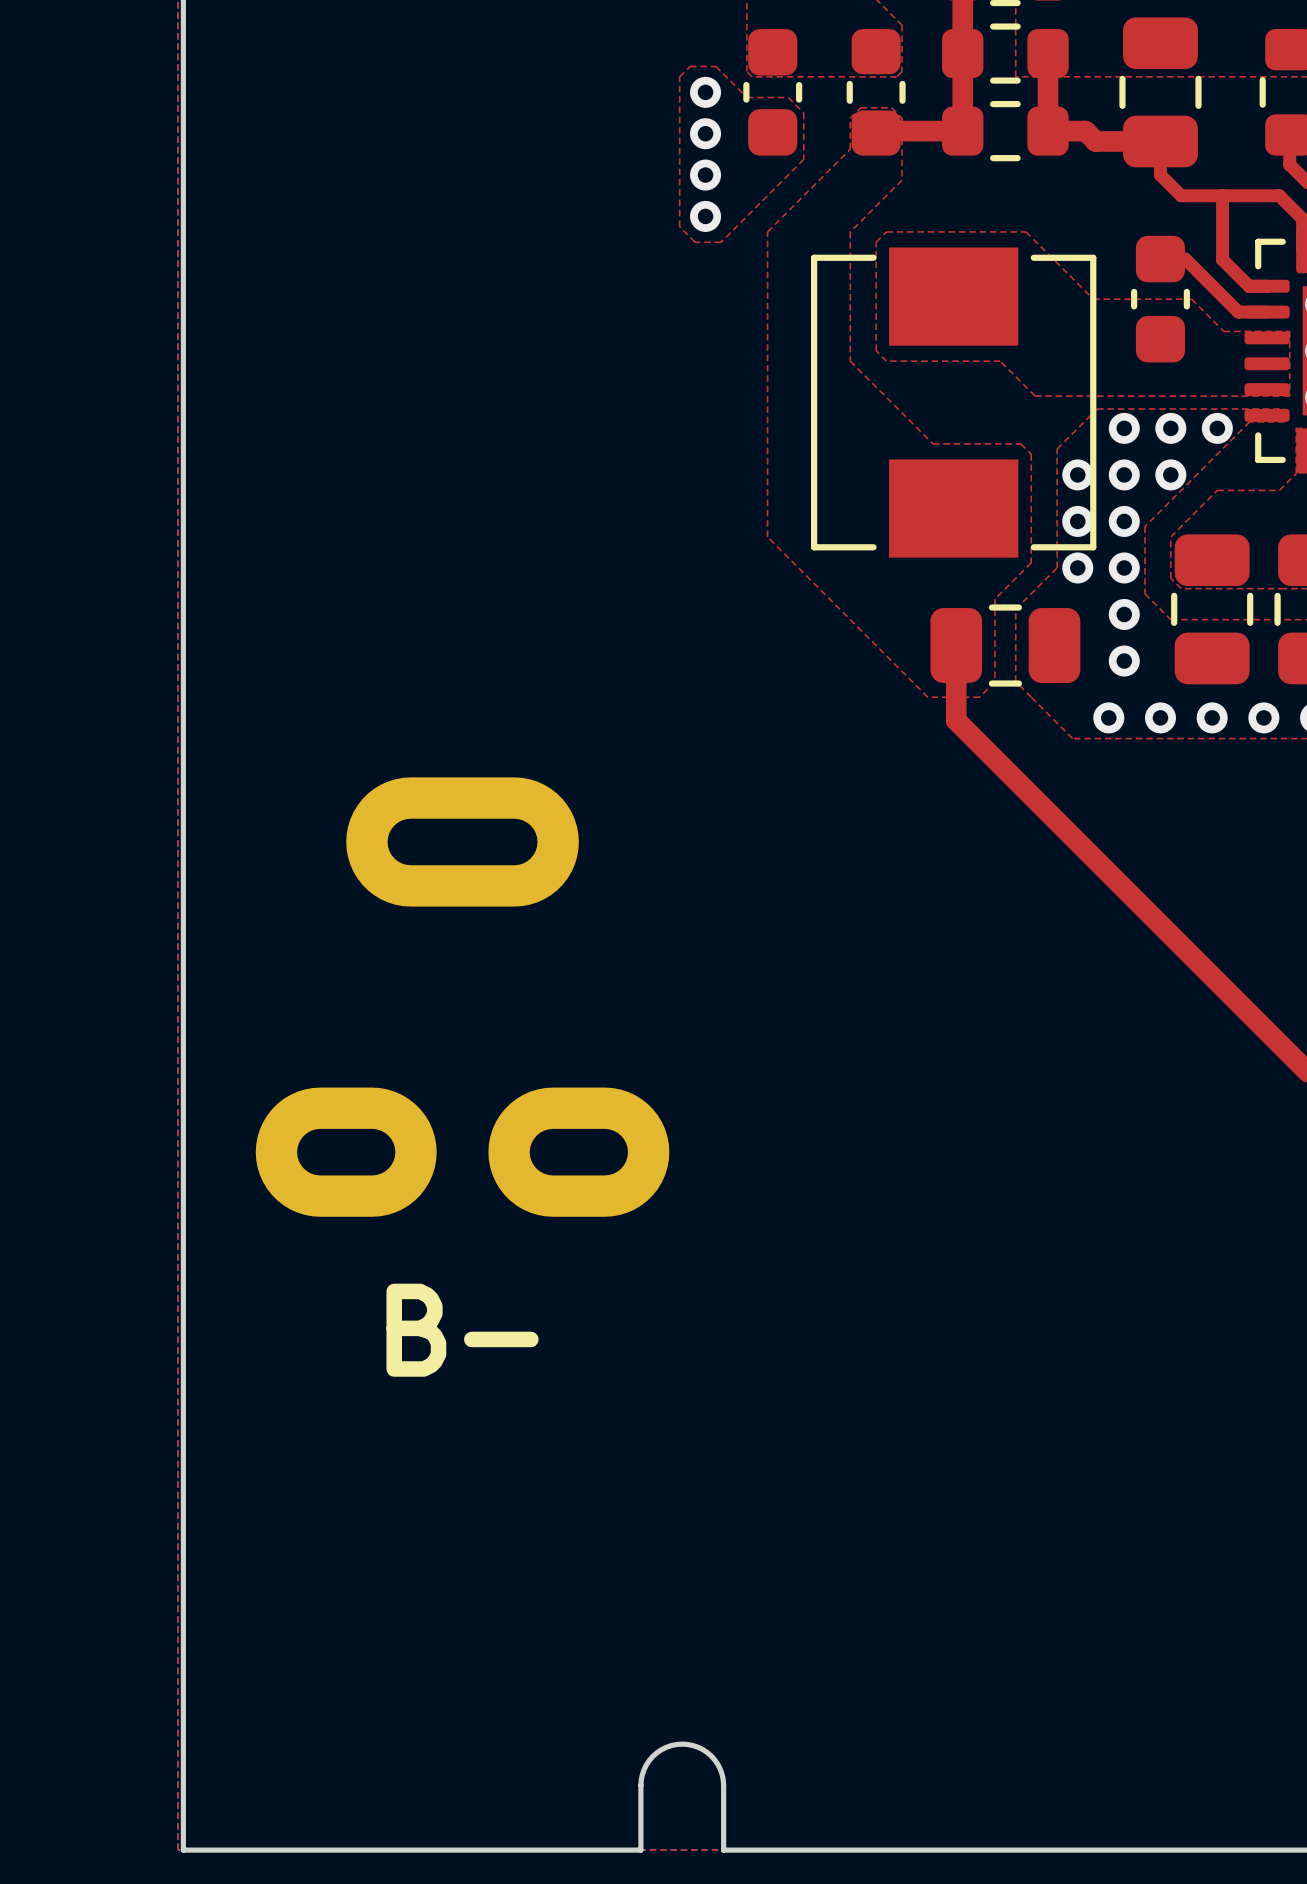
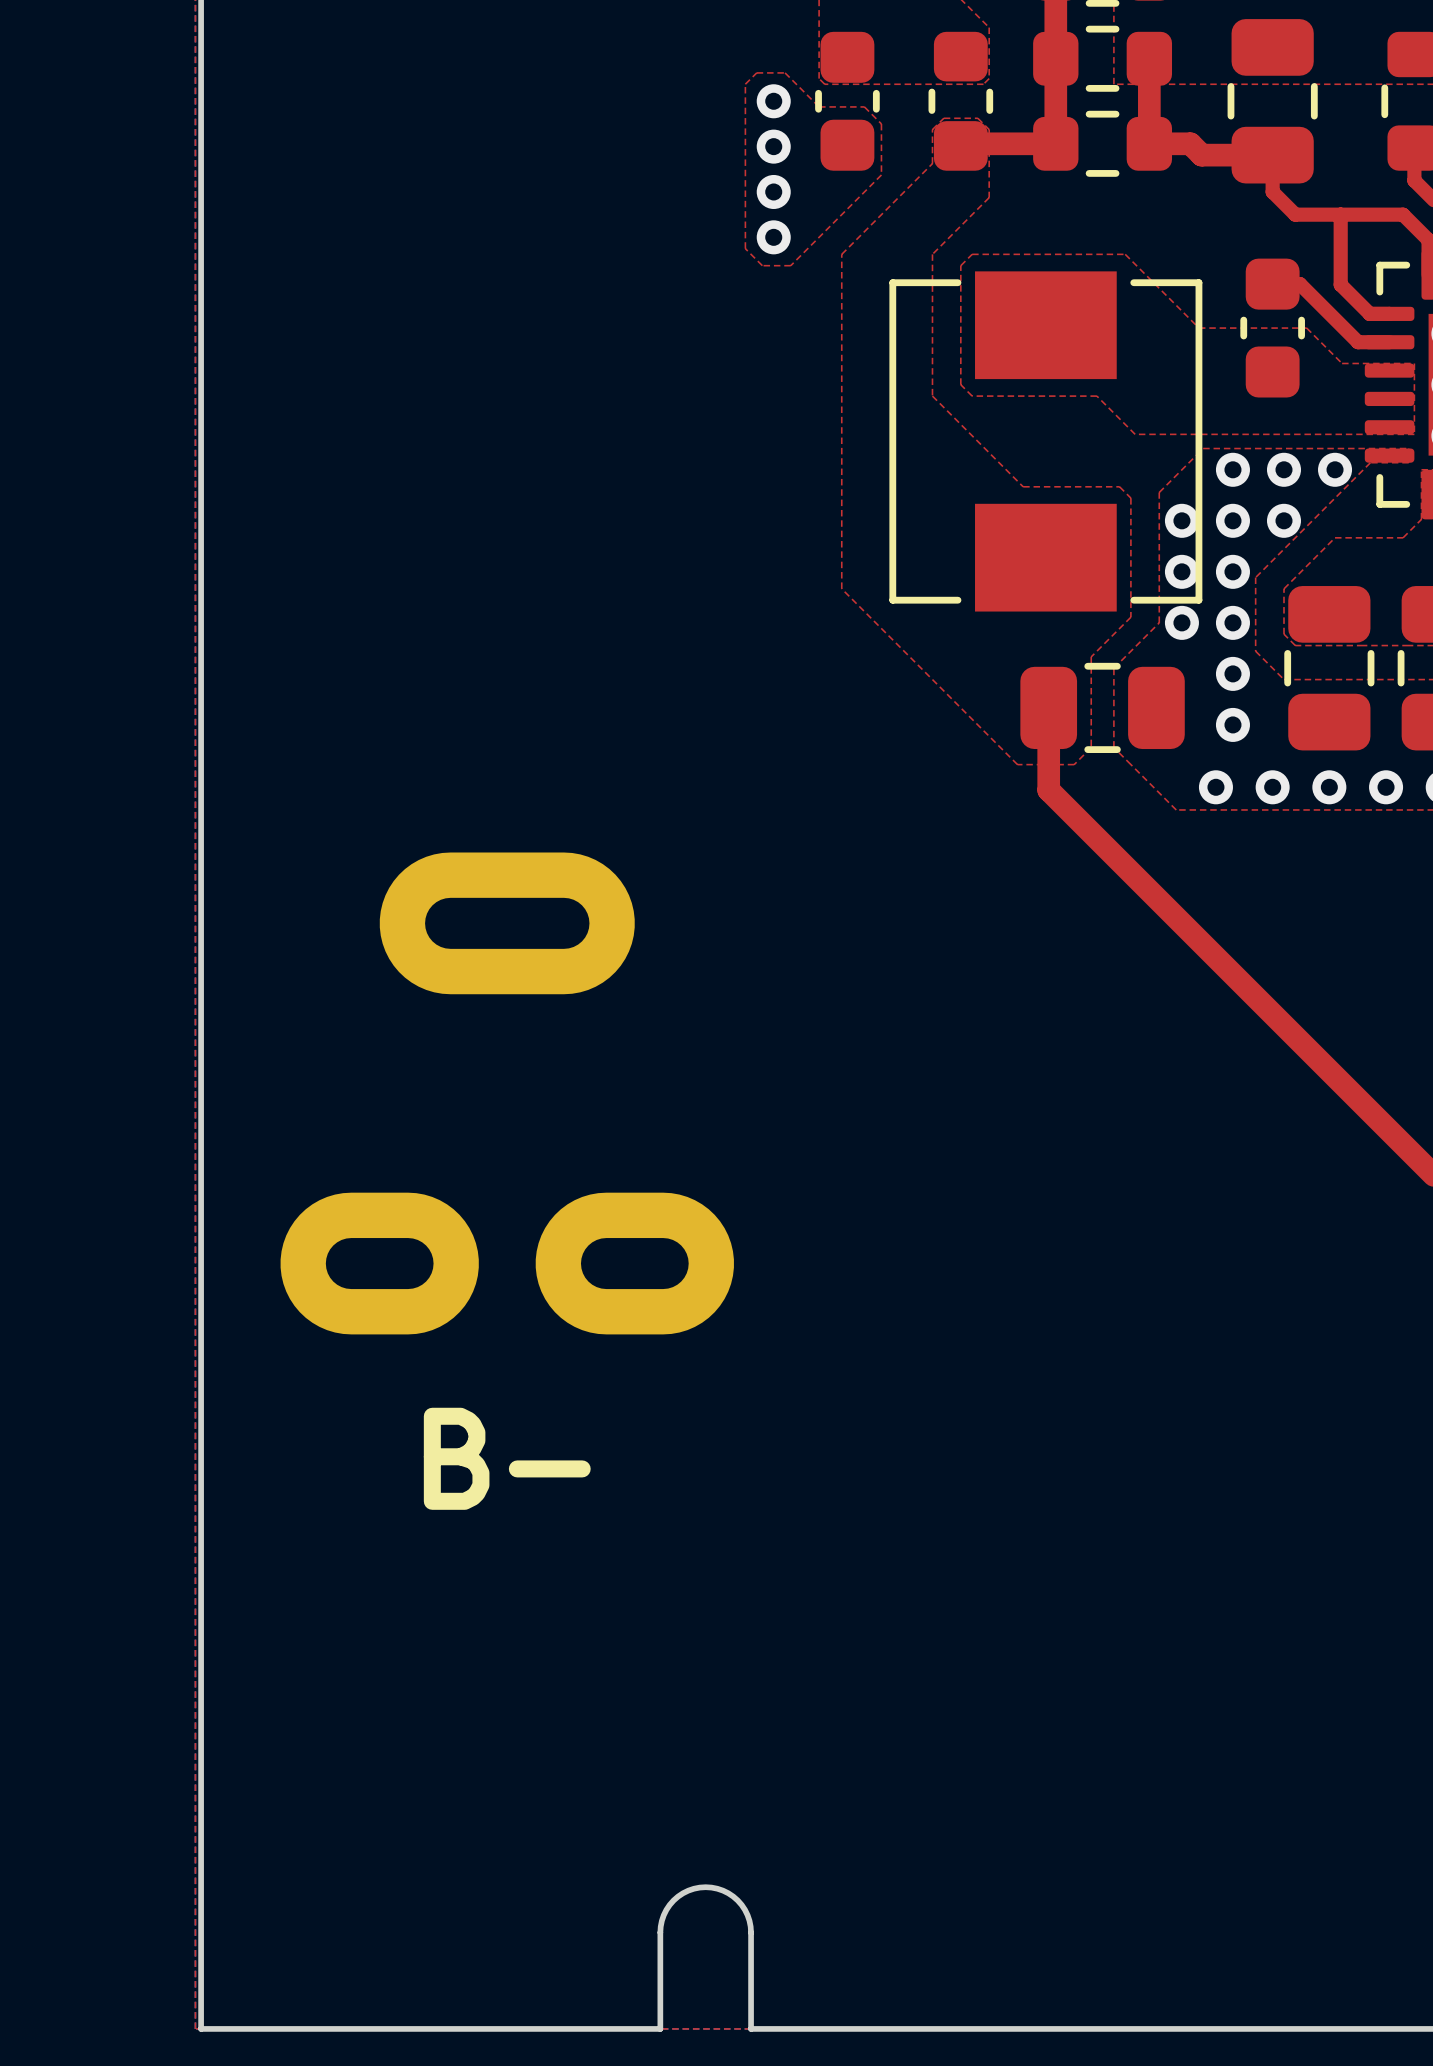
board edge: (602, 1850) (640, 1850) (640, 1785) (644, 1769) (657, 1752) (671, 1745) (682, 1744) (692, 1745) (707, 1752) (720, 1769) (723, 1785) (723, 1850) -> (660, 2028) (661, 1920) (669, 1904) (678, 1896) (693, 1888) (705, 1887) (717, 1888) (733, 1896) (741, 1904) (749, 1920) (751, 2028) (793, 2028)

